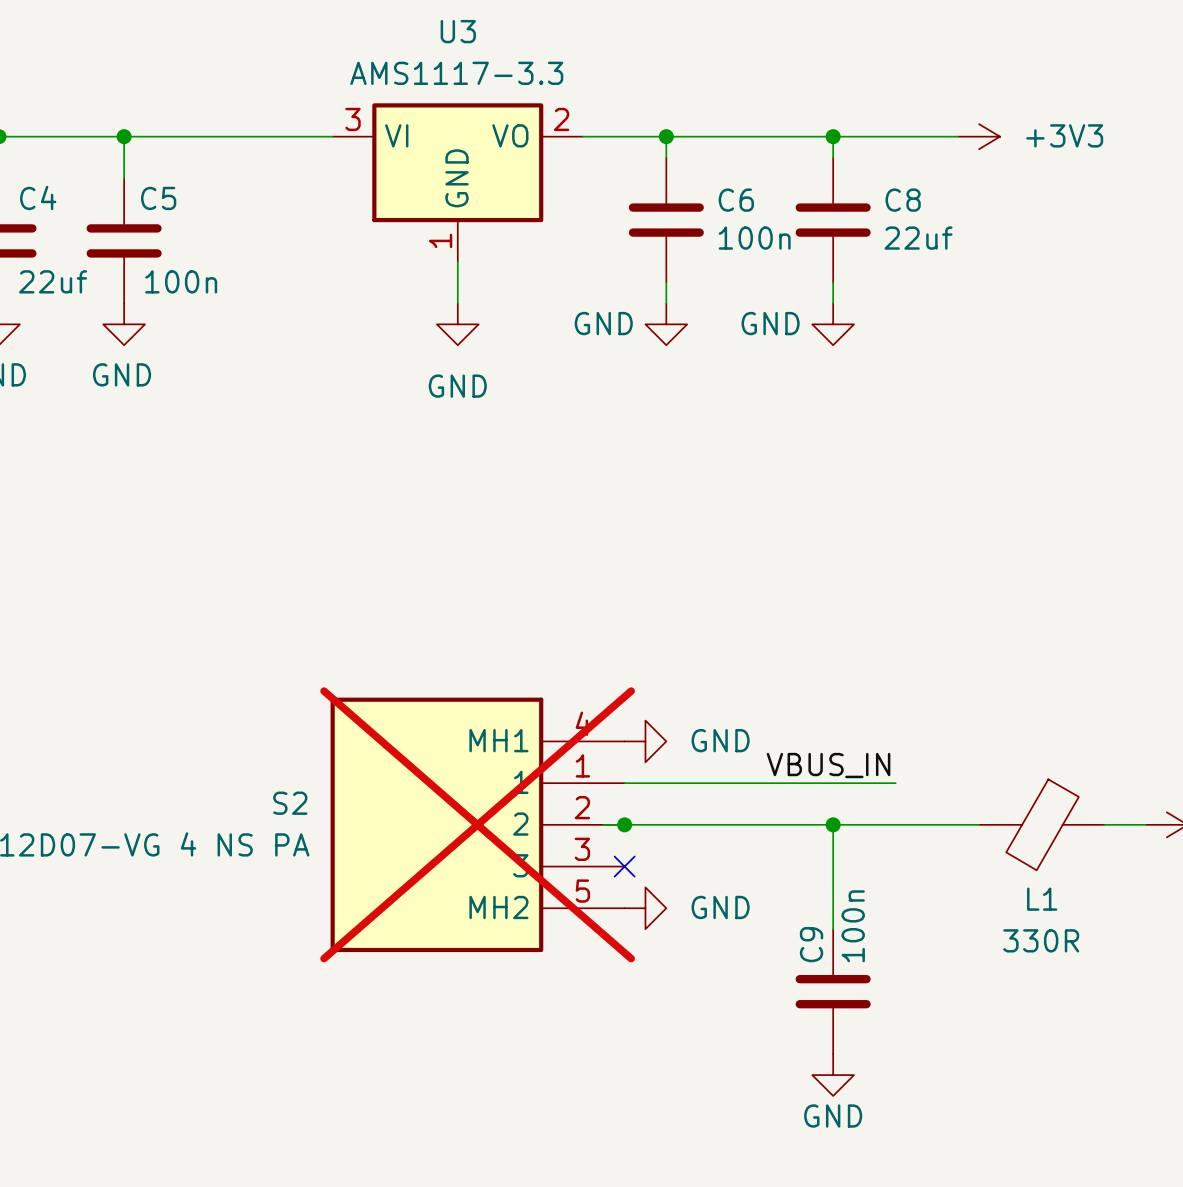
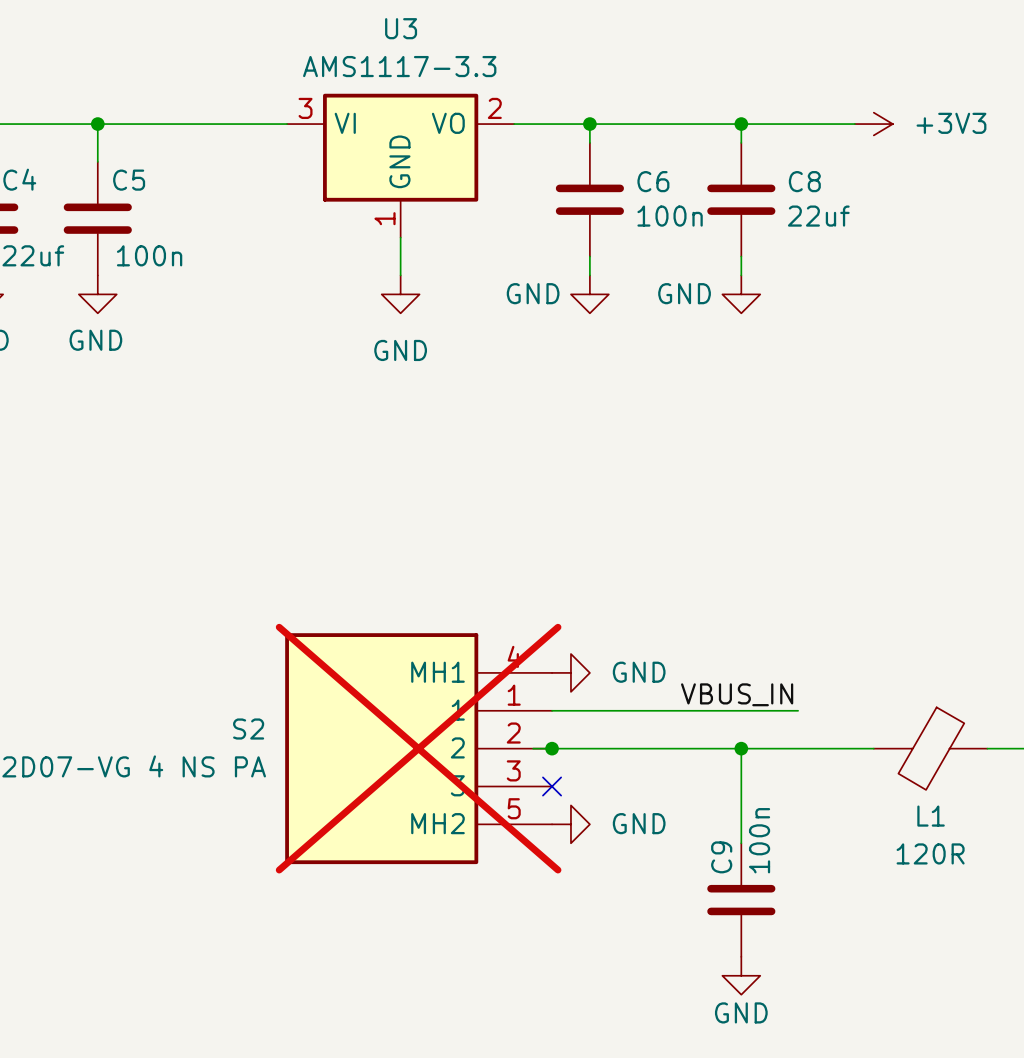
L1 value: 330R (1041, 940) -> 120R (930, 853)

